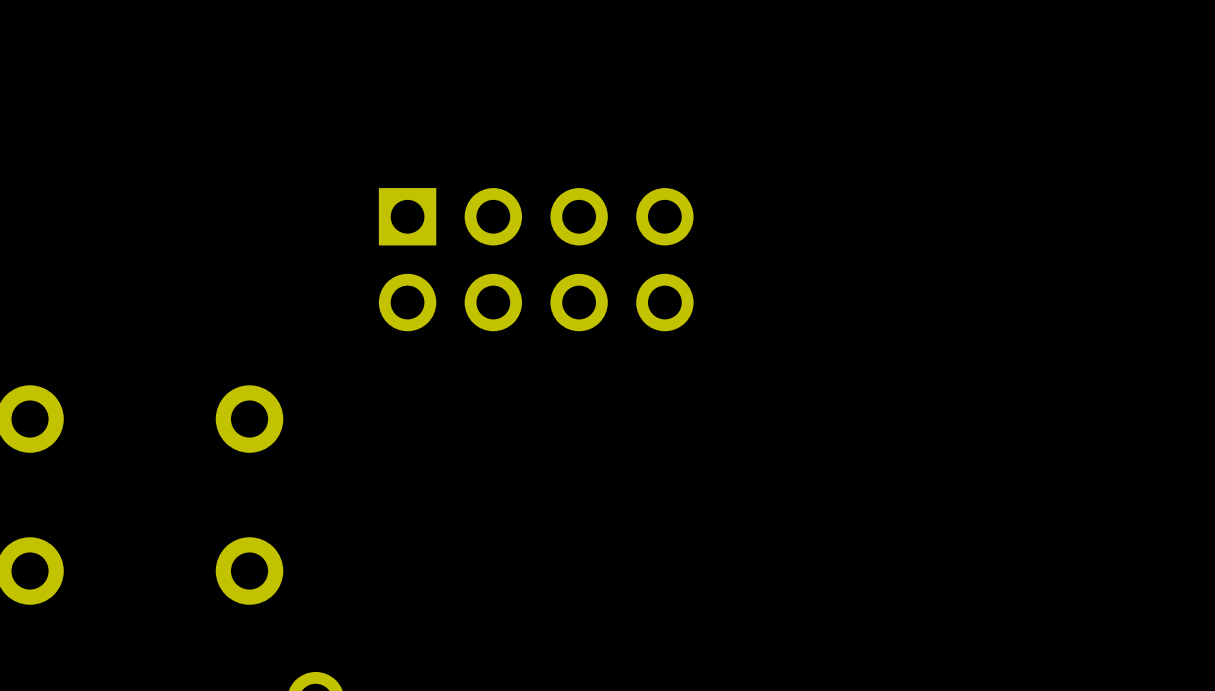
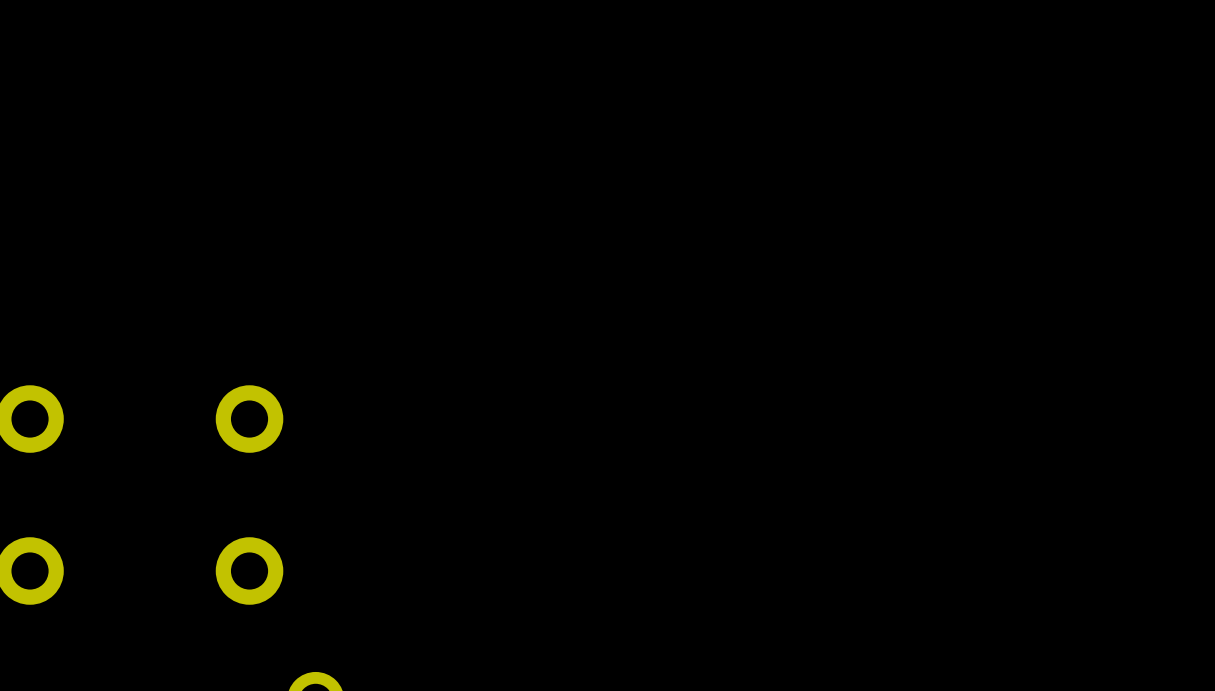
part: (536, 259) -> none

